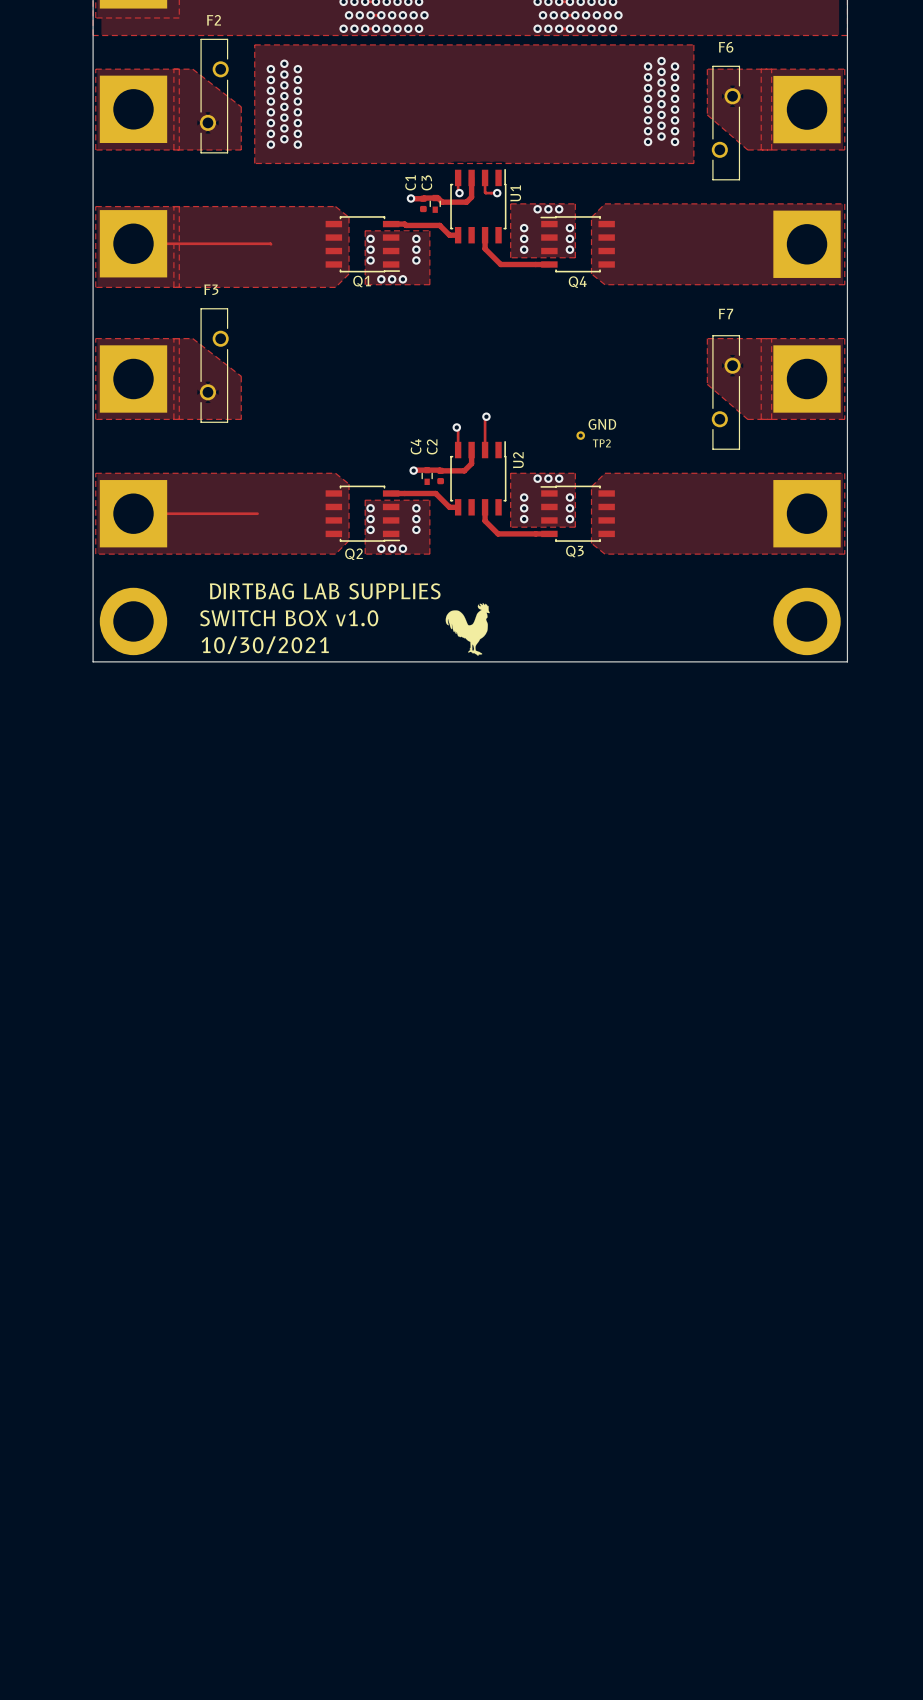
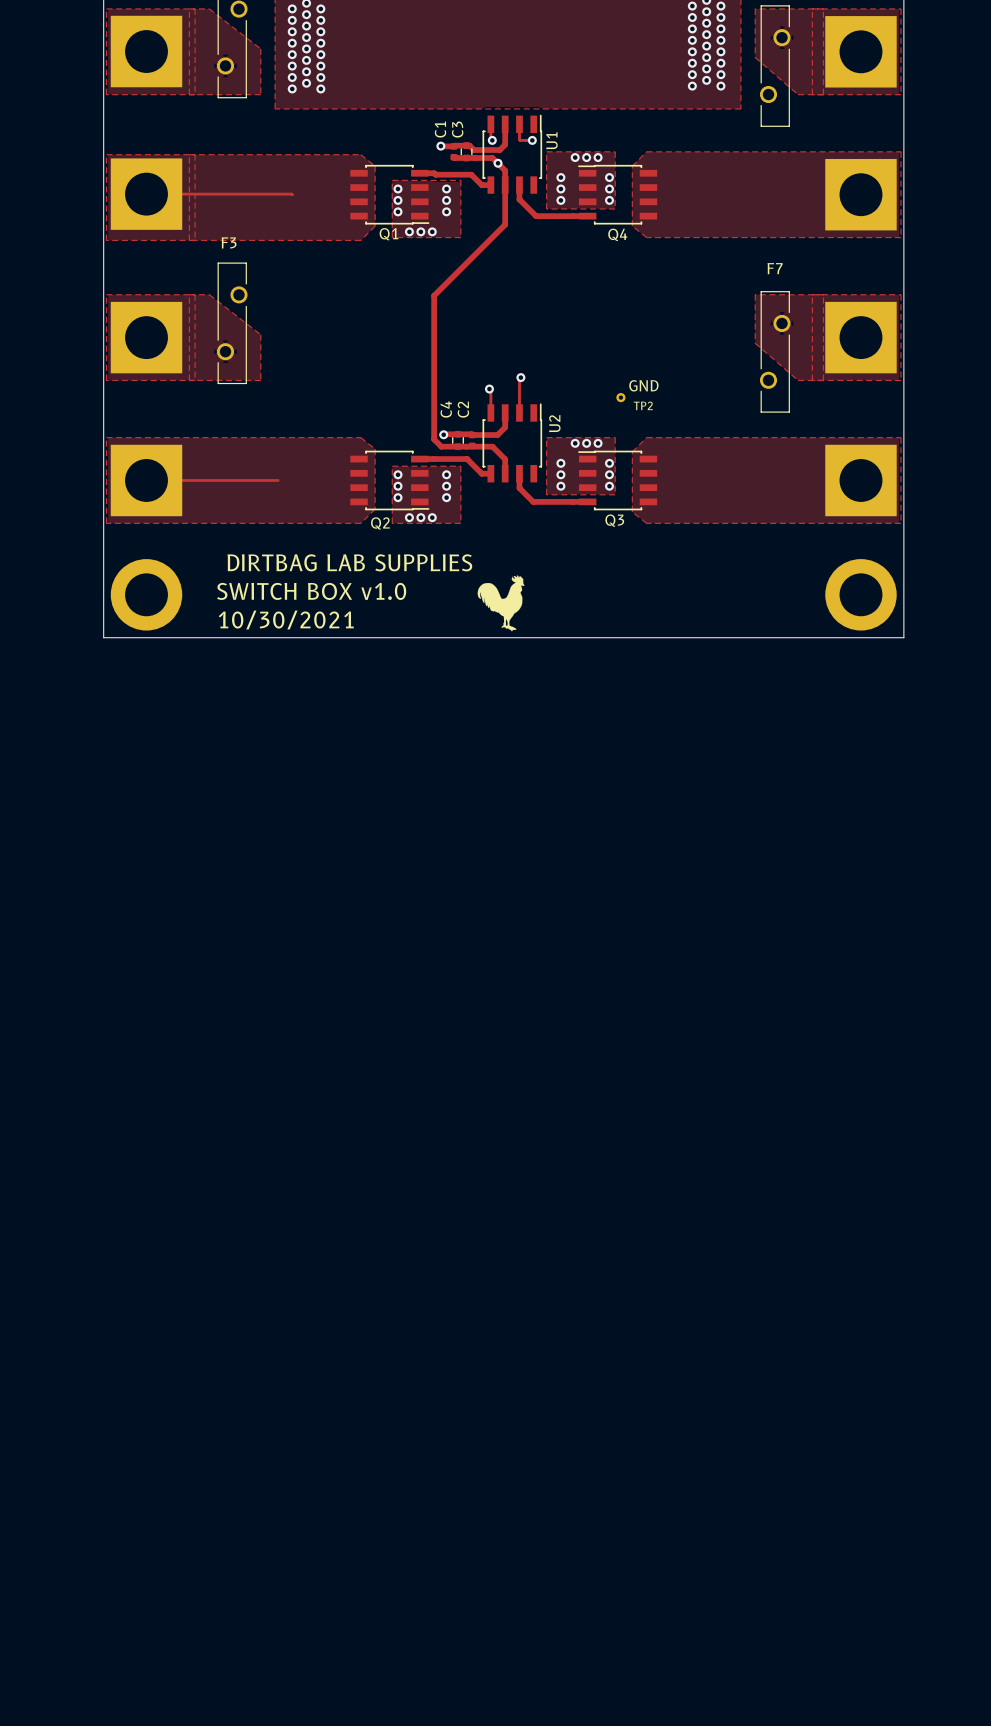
track: none -> (454, 157) (492, 158) (505, 170) (505, 224) (434, 295) (434, 439) (441, 446) (492, 446) (505, 459) (505, 473)
via: none -> (498, 163)

